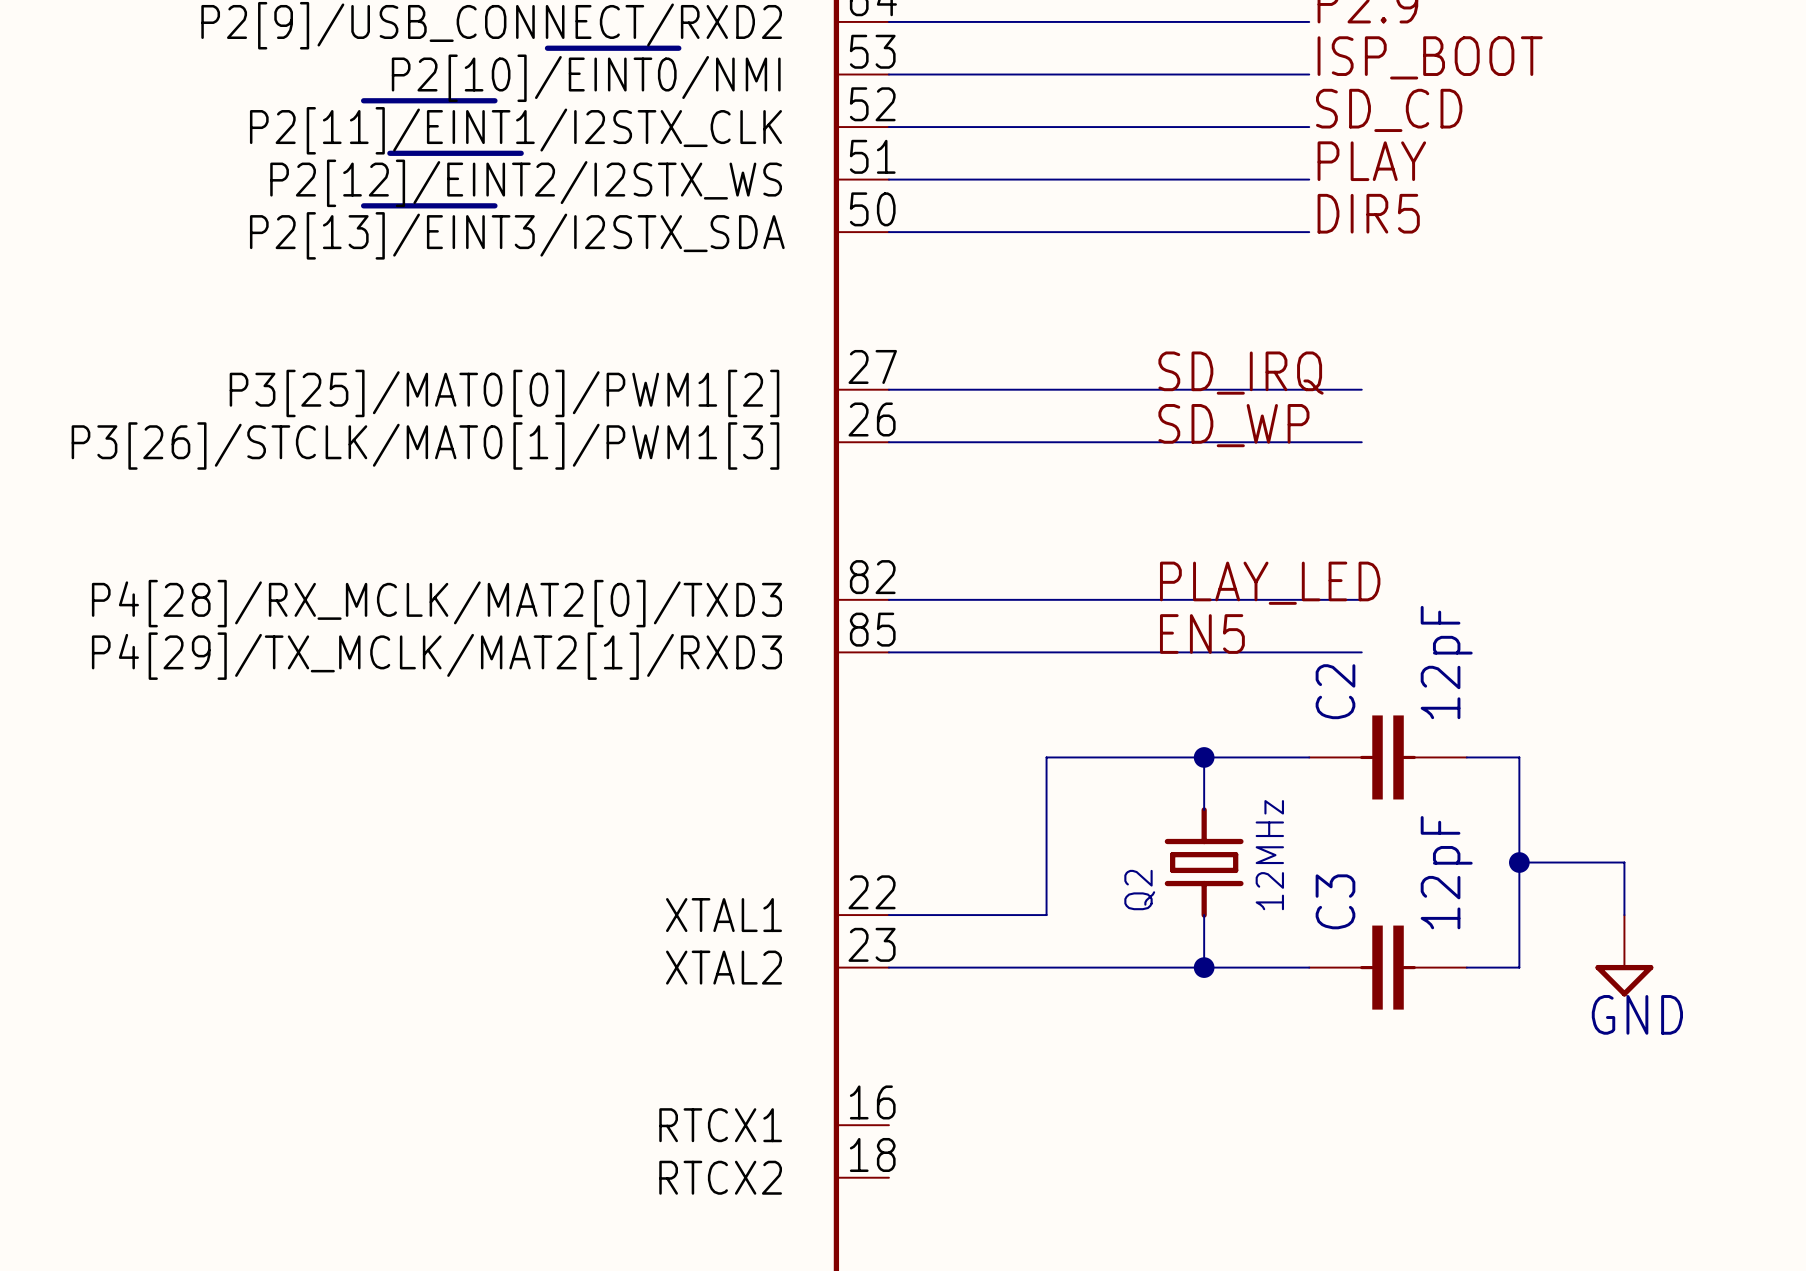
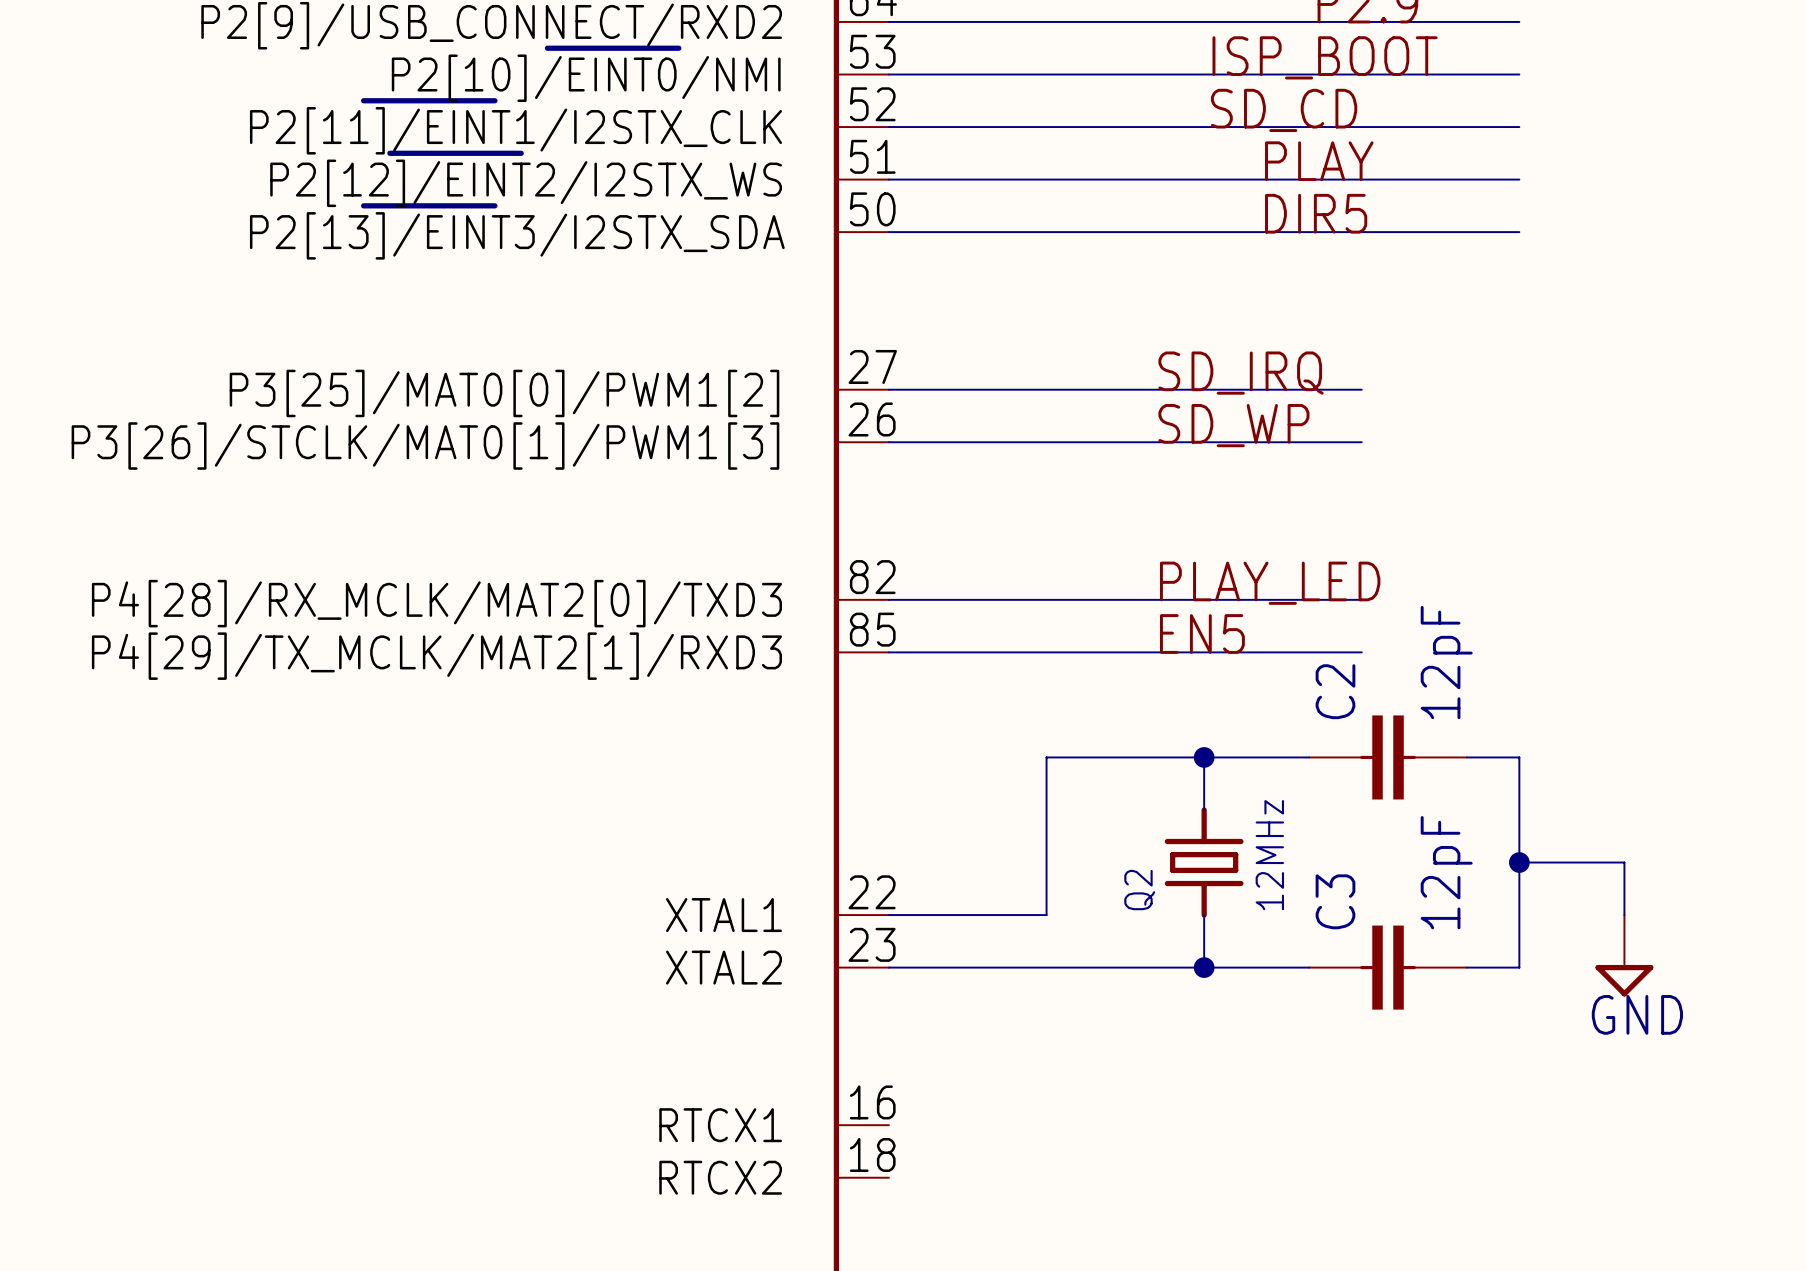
wire: none -> (1309, 21) (1519, 21)
label position: ISP_BOOT (1430, 57) -> ISP_BOOT (1325, 57)
wire: none -> (1309, 74) (1519, 74)
label position: SD_CD (1389, 110) -> SD_CD (1284, 110)
wire: none -> (1309, 127) (1519, 127)
label position: PLAY (1371, 161) -> PLAY (1319, 161)
wire: none -> (1309, 179) (1519, 179)
label position: DIR5 (1368, 213) -> DIR5 (1316, 213)
wire: none -> (1309, 232) (1519, 232)

